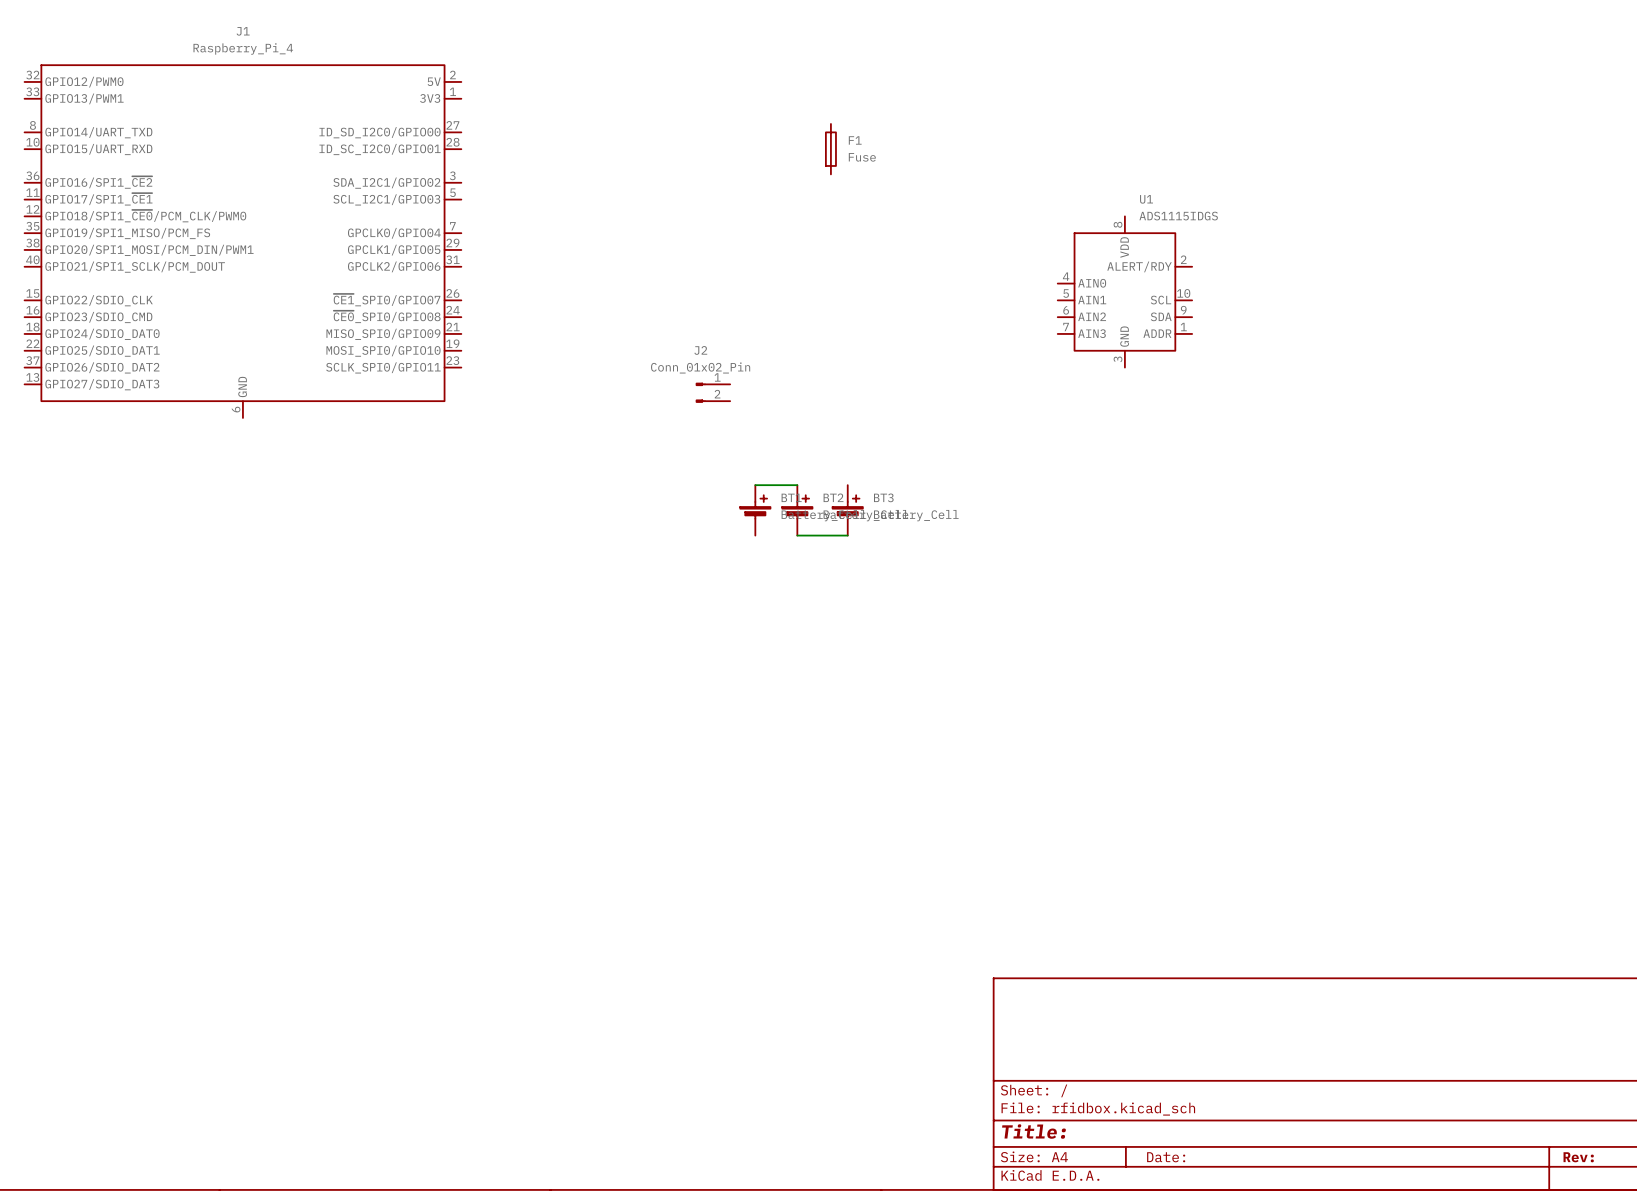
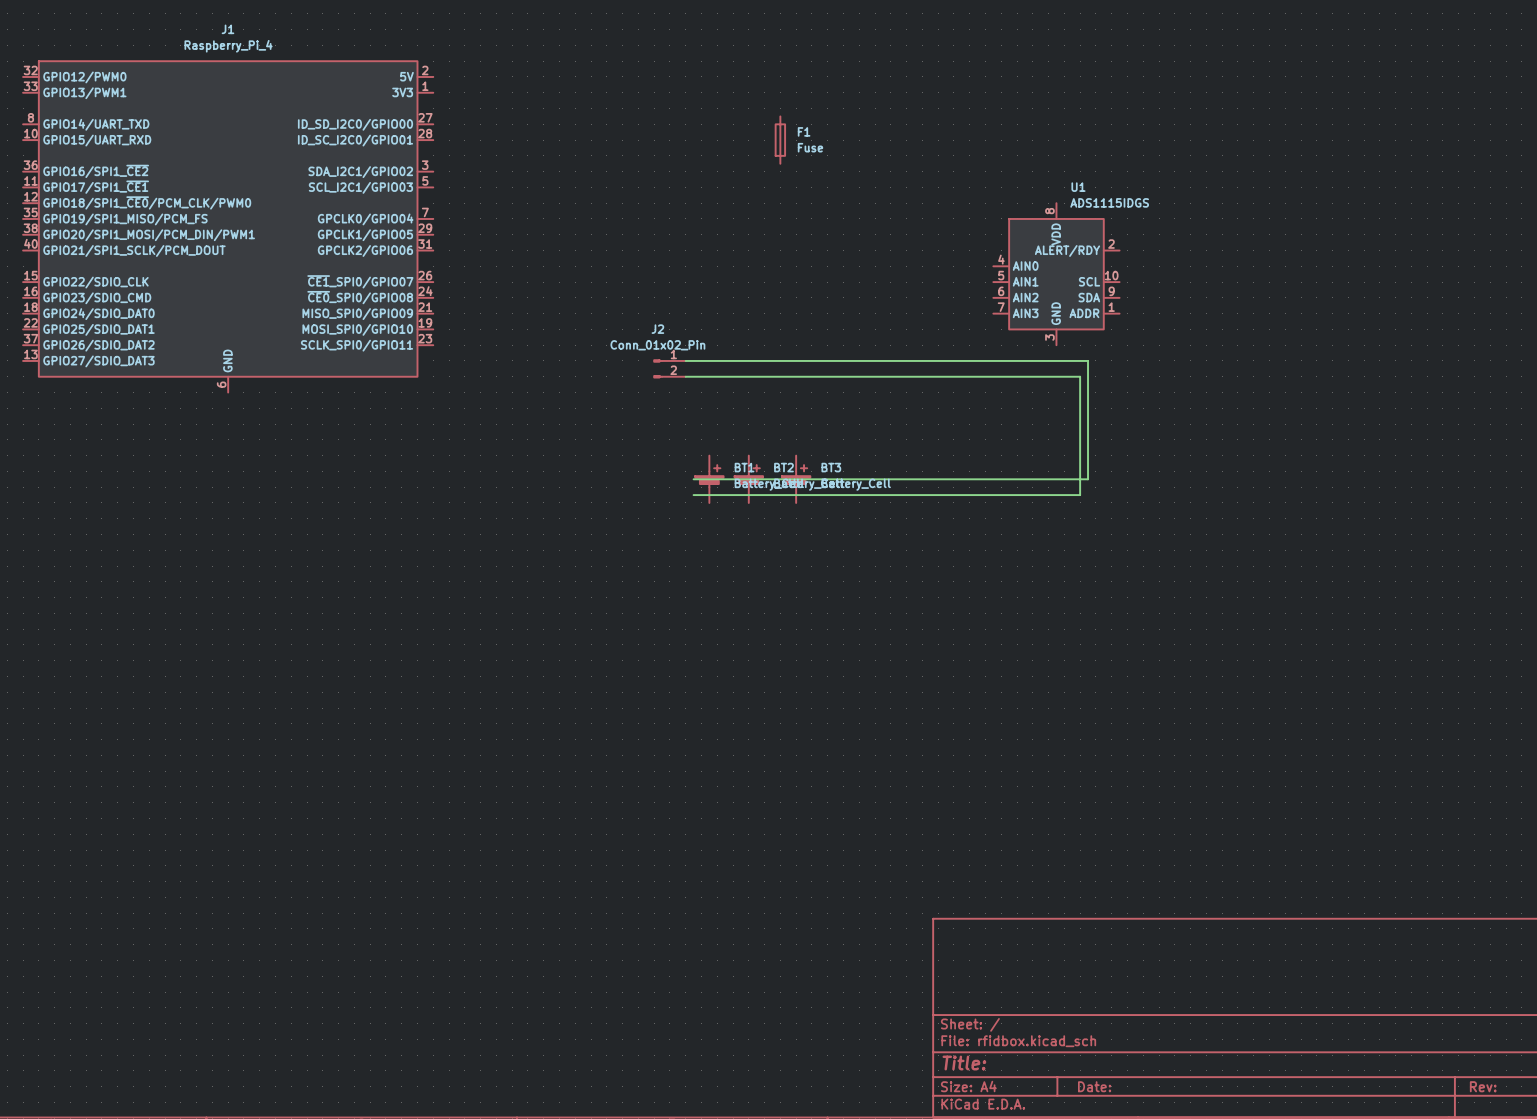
wire: none -> (685, 360) (1088, 360) (1088, 479) (693, 479)
wire: none -> (685, 376) (1080, 376) (1080, 495) (693, 495)
wire: (755, 485) (797, 485) -> none
wire: (797, 535) (847, 535) -> none

